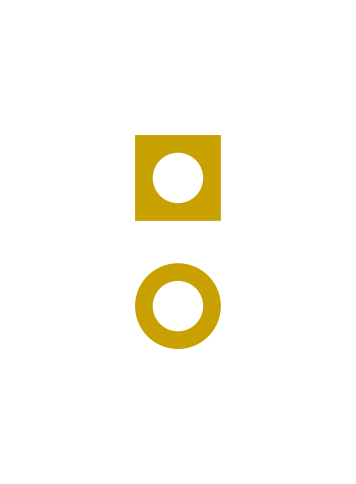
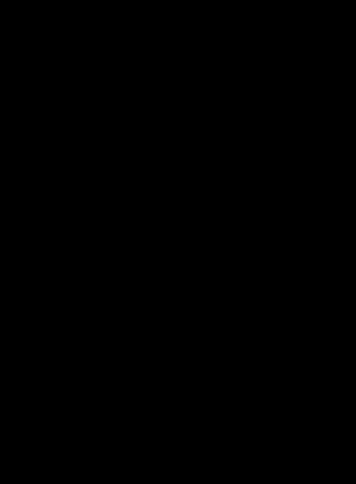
part: (177, 242) -> none

